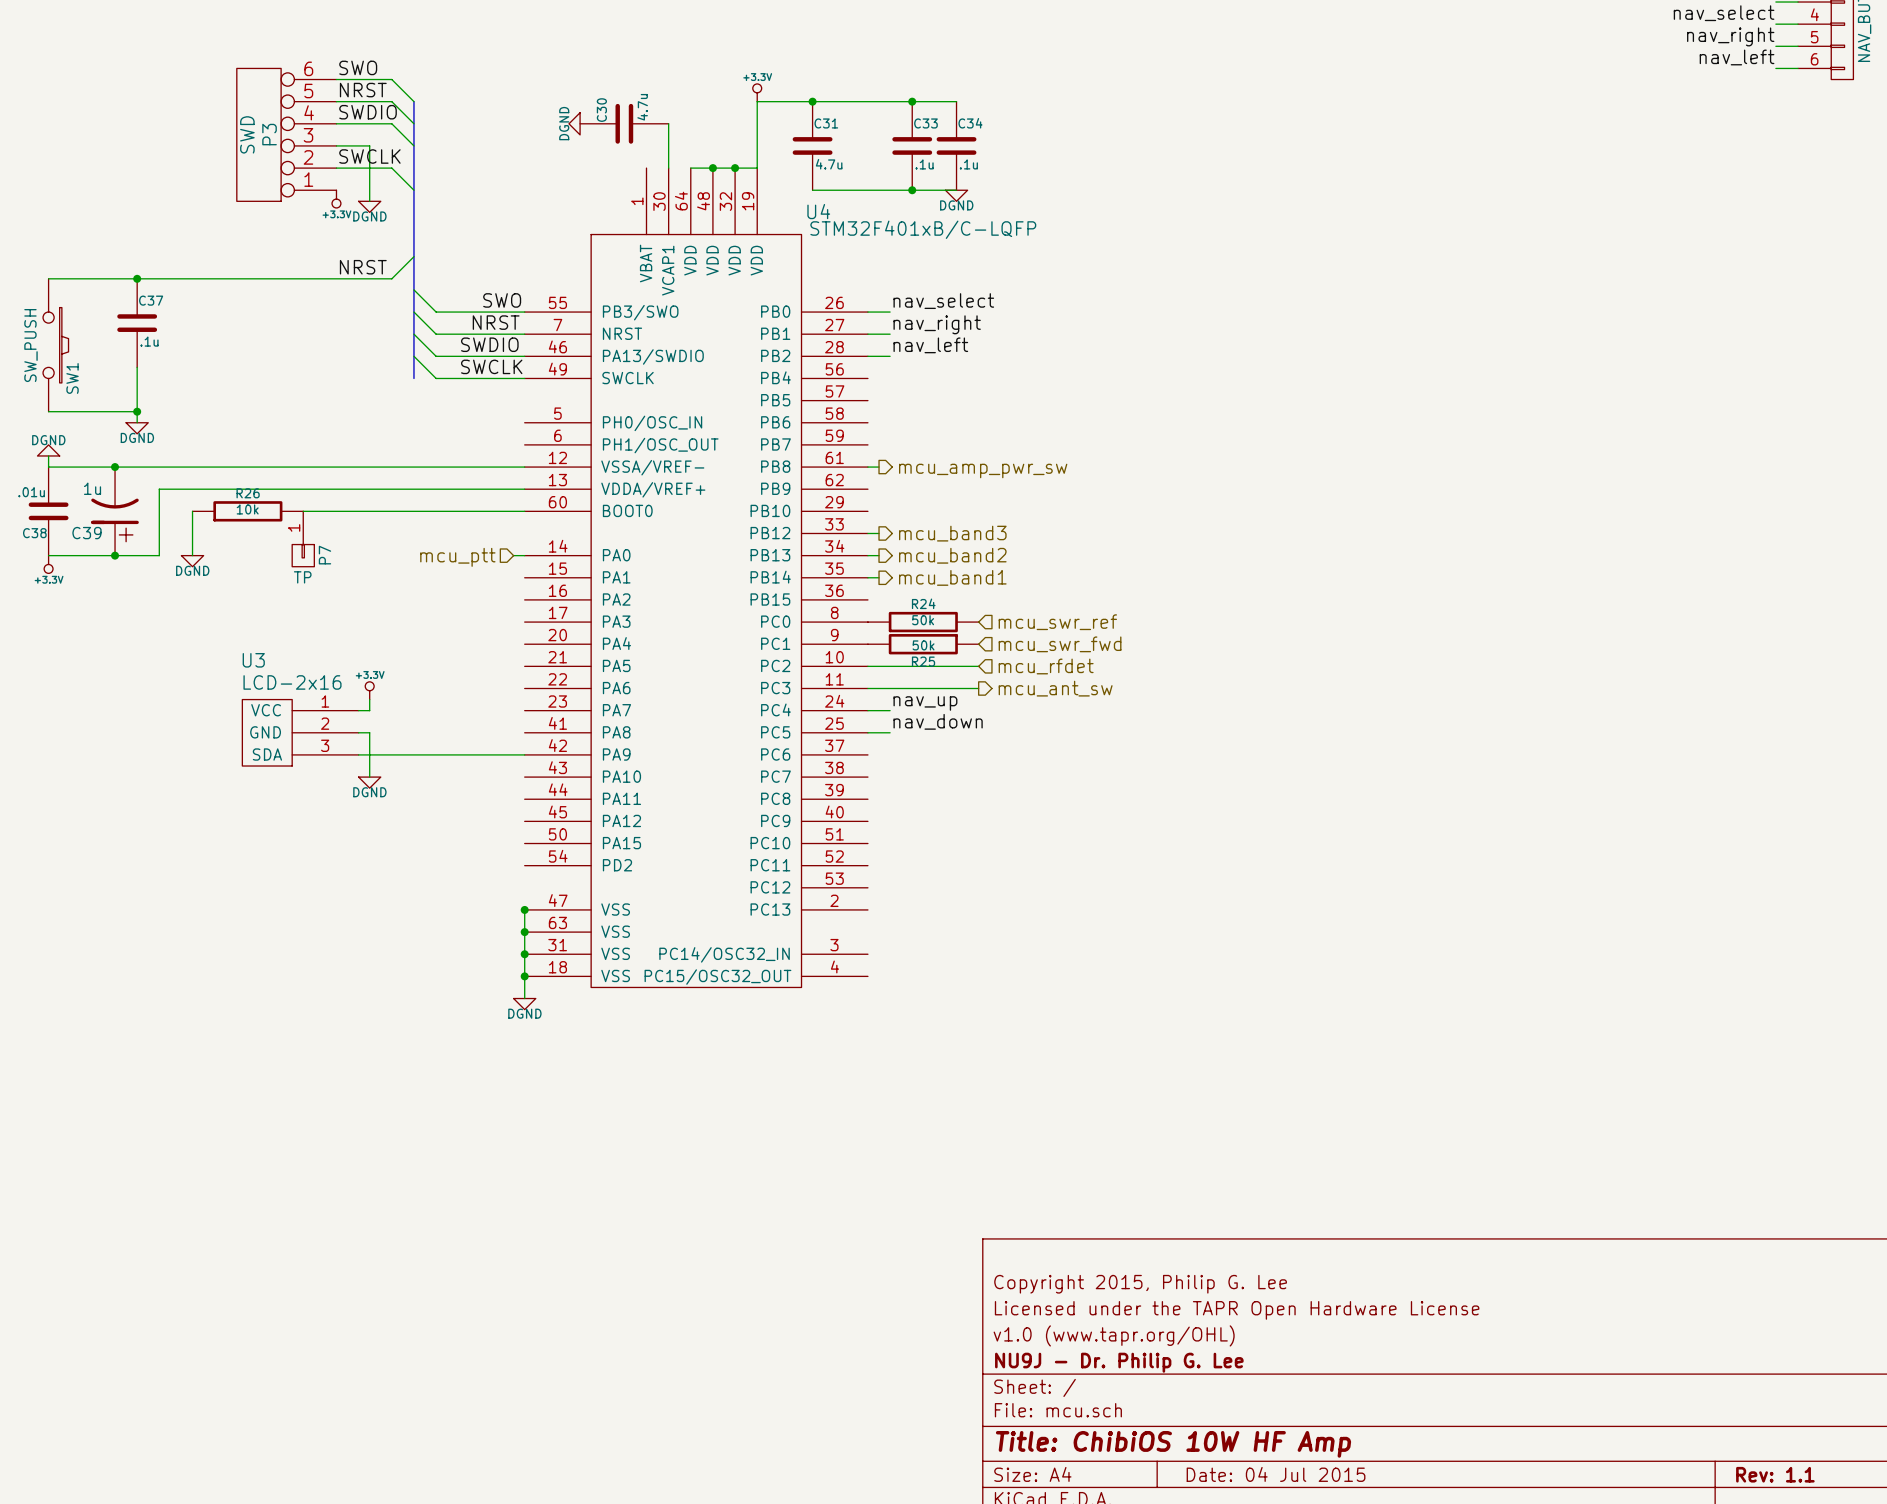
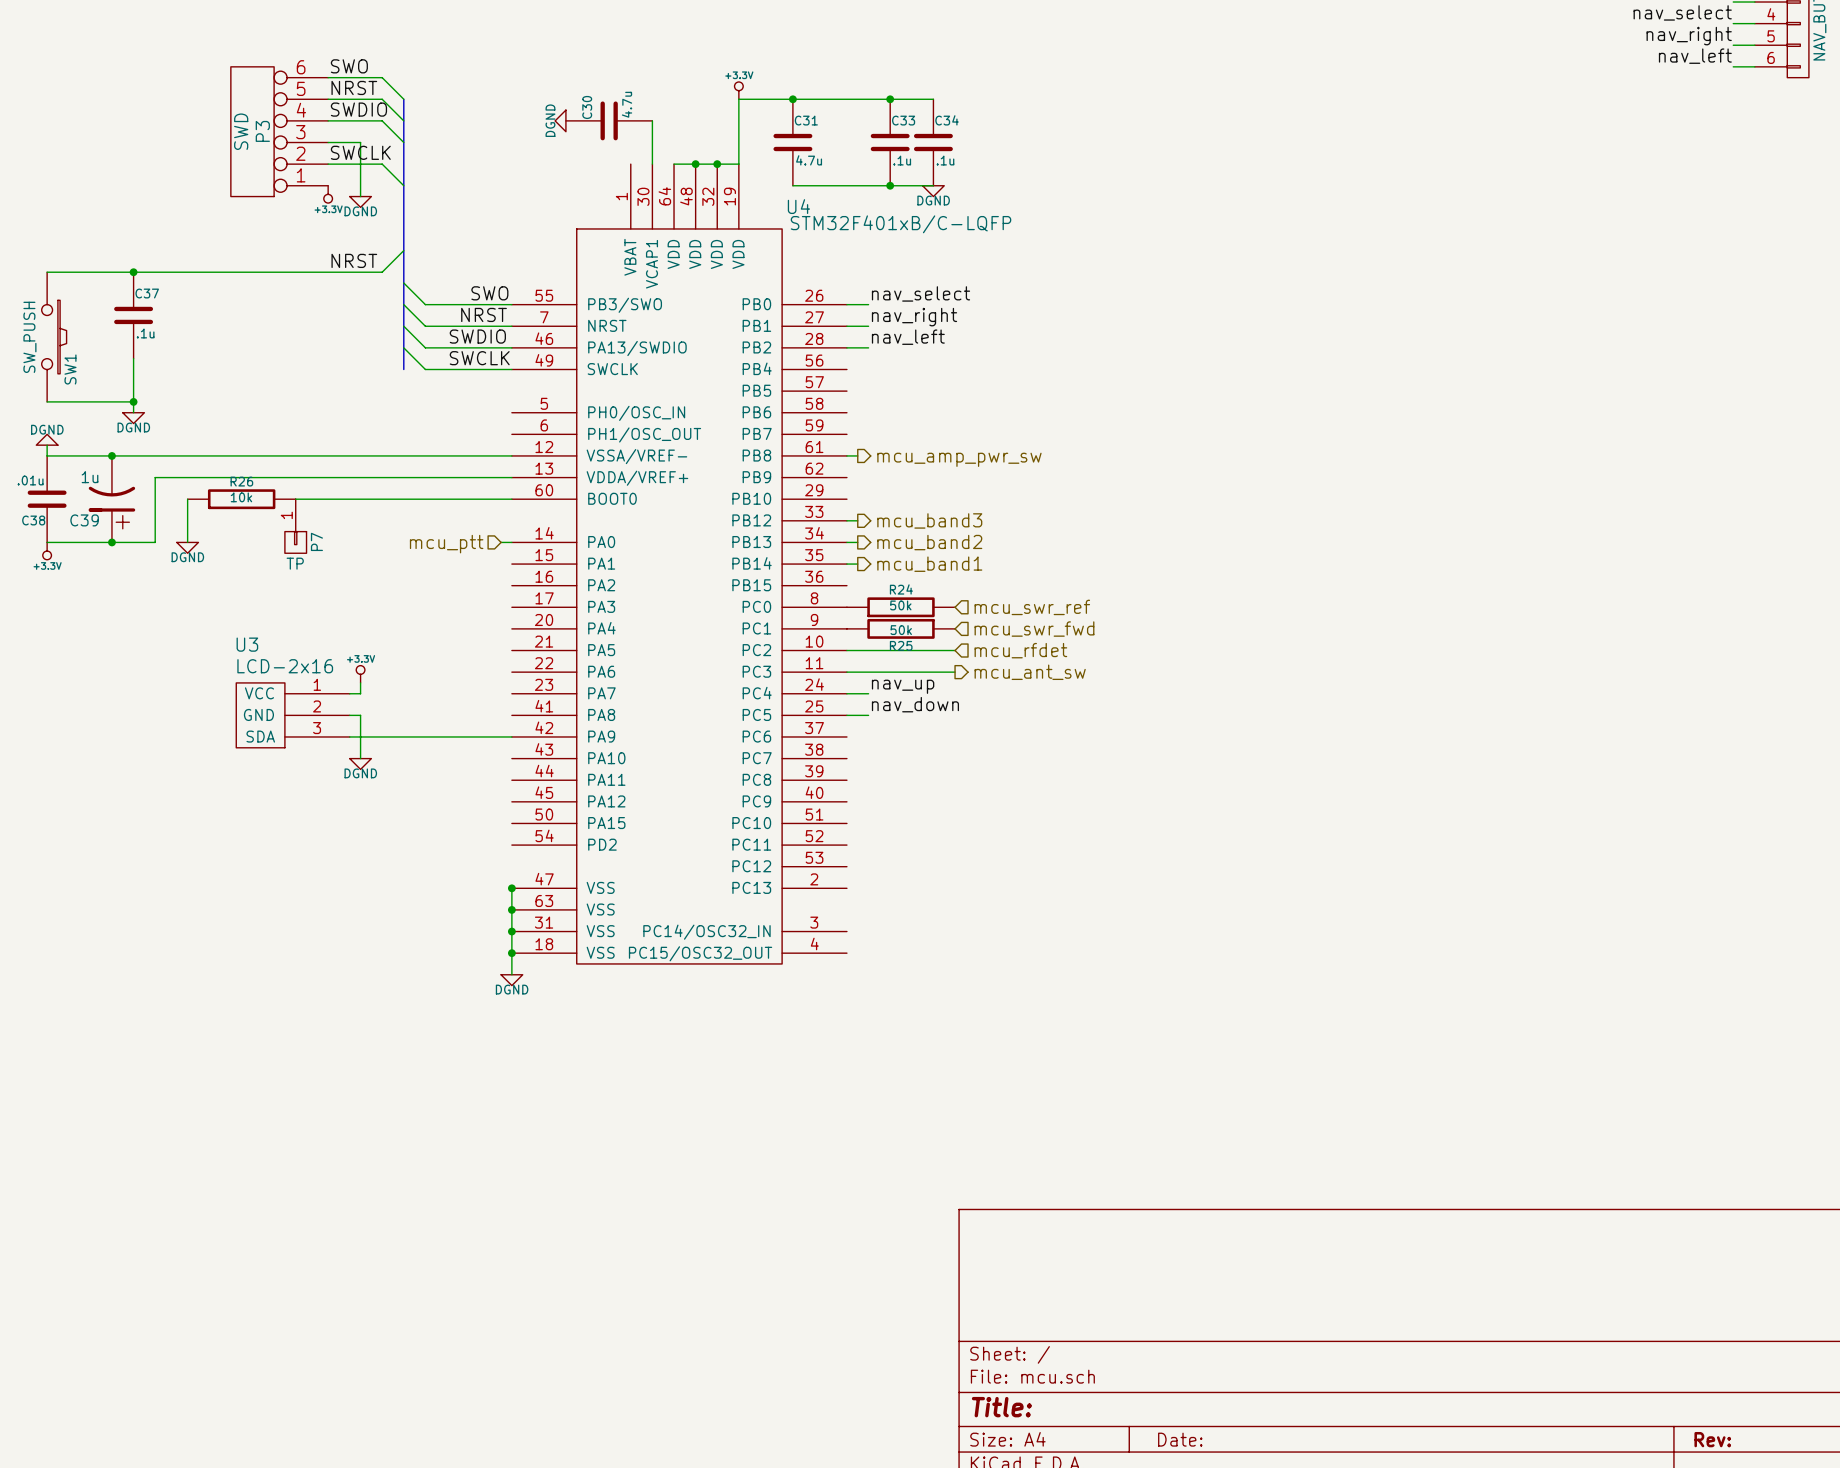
title block: Copyright 2015, Philip G. Lee (1140, 1284) -> none
title block: Licensed under the TAPR Open Hardware License (1237, 1310) -> none
title block: v1.0 (www.tapr.org/OHL) (1114, 1335) -> none
title block: NU9J - Dr. Philip G. Lee (1119, 1362) -> none
title block: Title: ChibiOS 10W HF Amp (1173, 1444) -> Title: (1001, 1407)
title block: Date: 04 Jul 2015 (1276, 1474) -> Date: (1180, 1439)
title block: Rev: 1.1 (1775, 1474) -> Rev: (1712, 1439)

